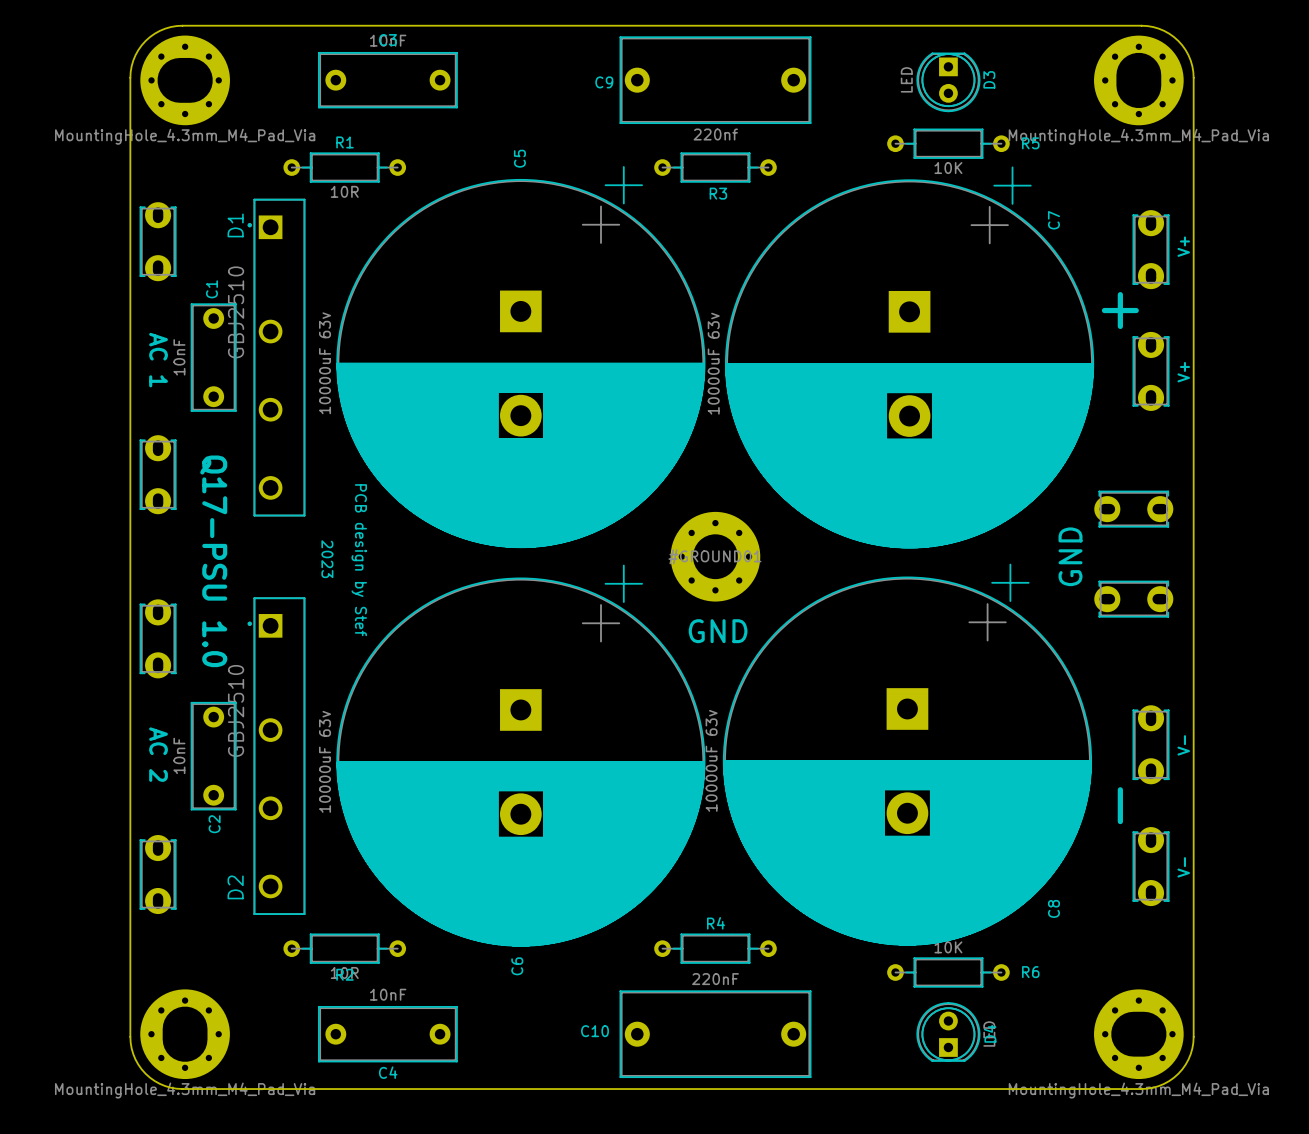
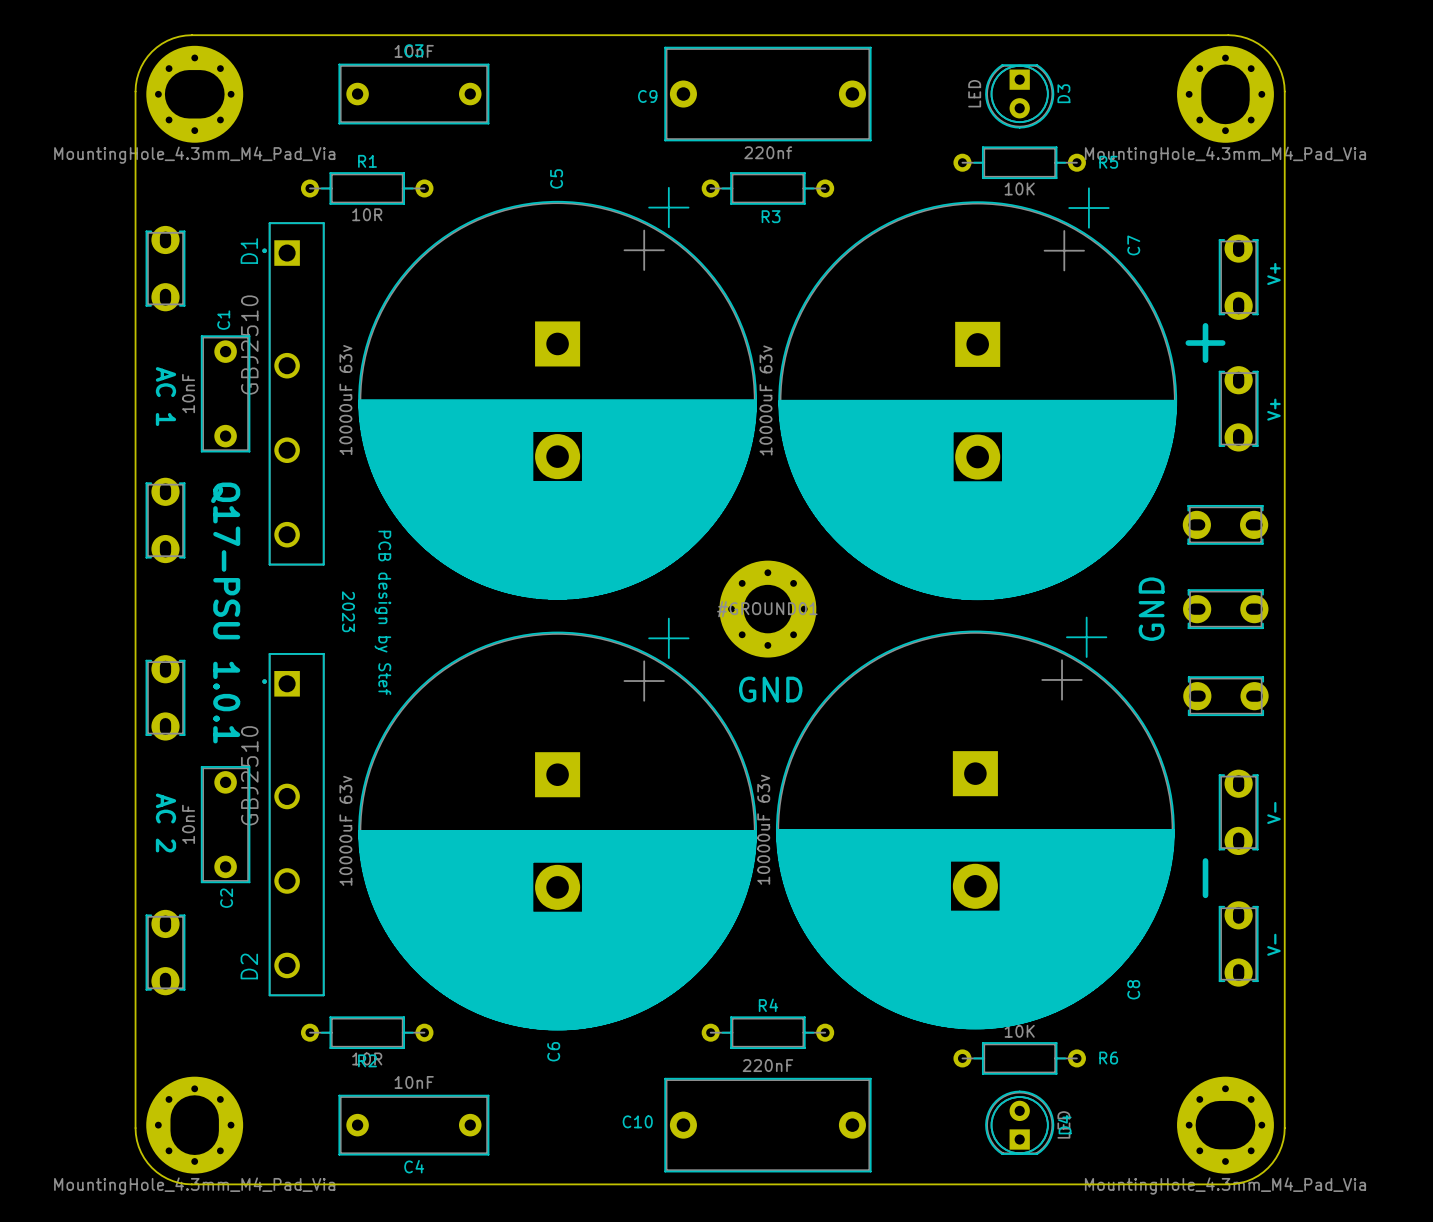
part: none -> (1225, 524)
part: (1133, 509) -> none
part: none -> (1225, 609)
text: Q17-PSU 1.0 (213, 561) -> Q17-PSU 1.0.1 (225, 612)
part: (1133, 599) -> none
part: none -> (1225, 696)

